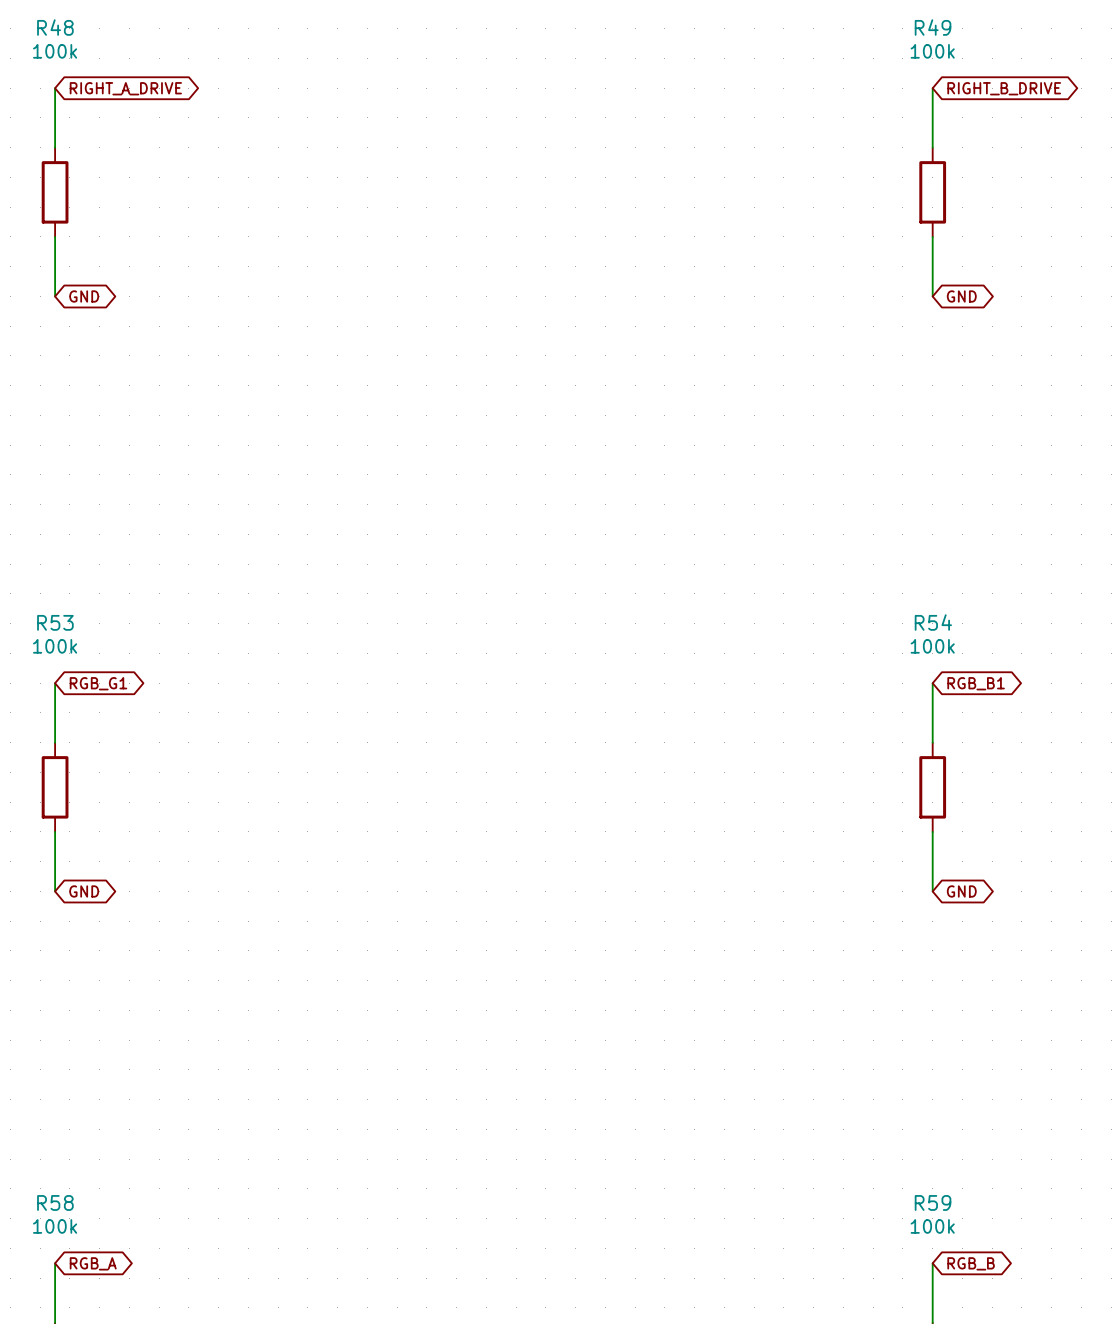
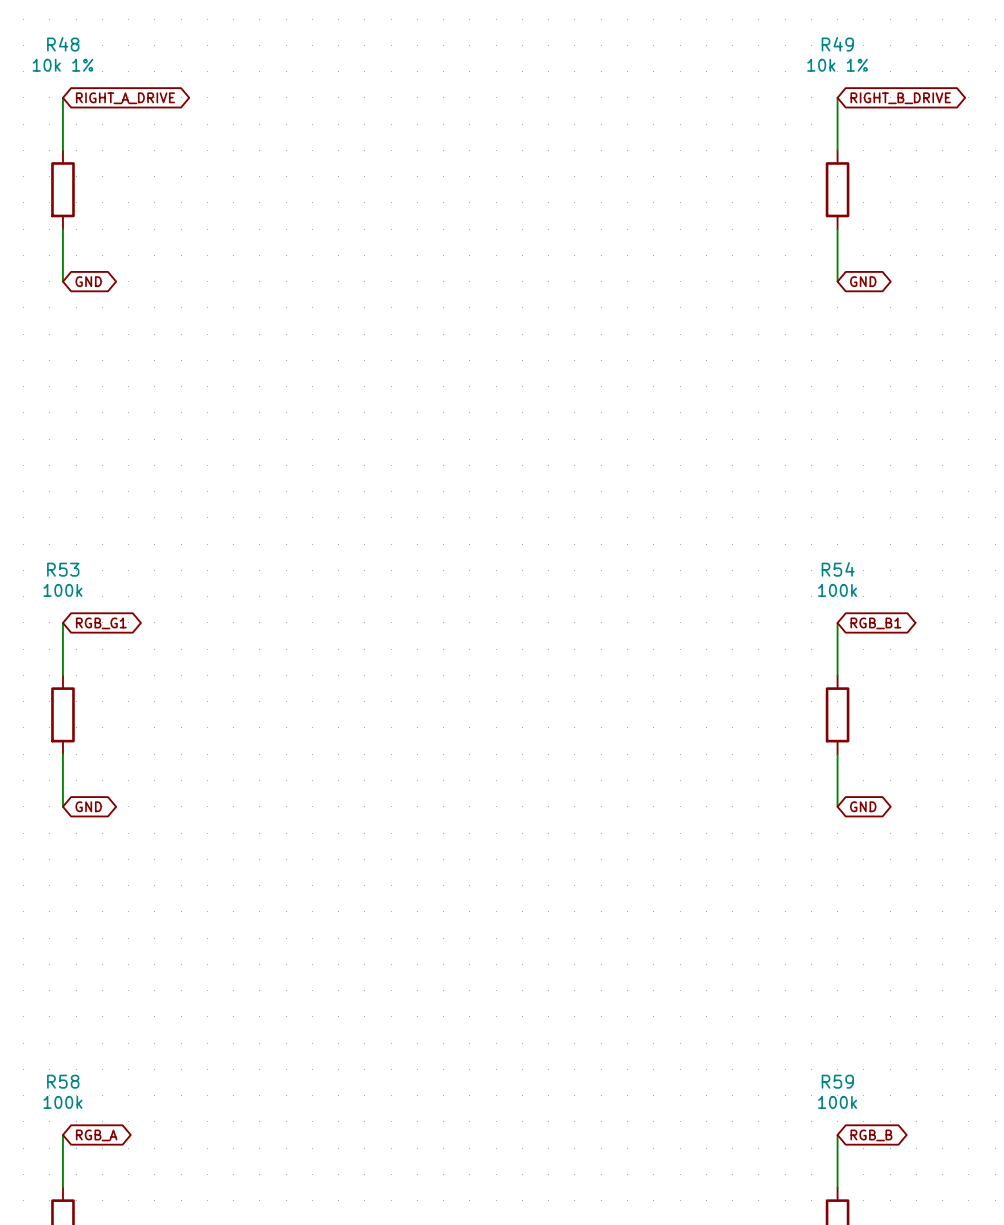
R48 value: 100k (55, 51) -> 10k 1% (62, 65)
R49 value: 100k (932, 51) -> 10k 1% (837, 65)

